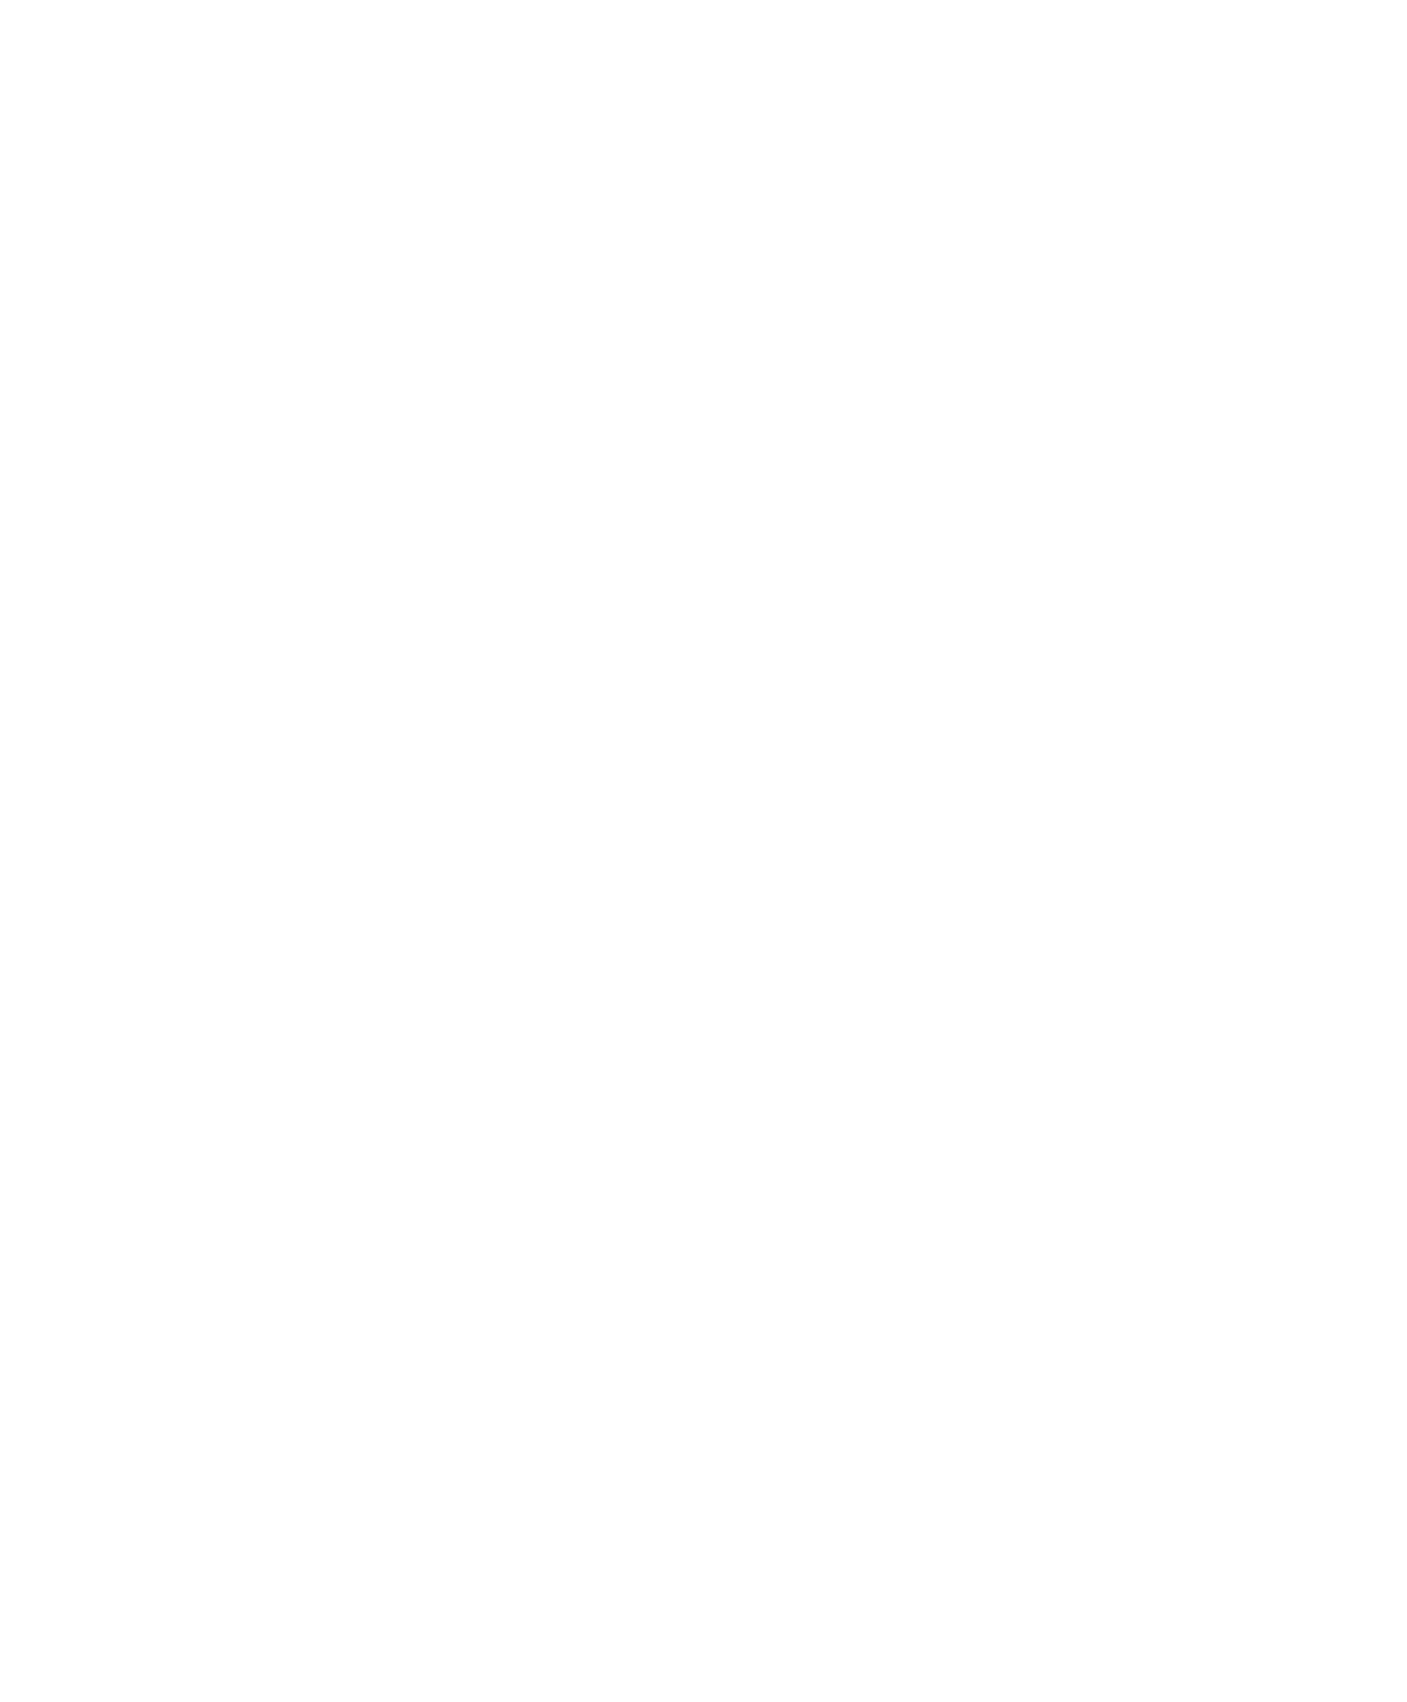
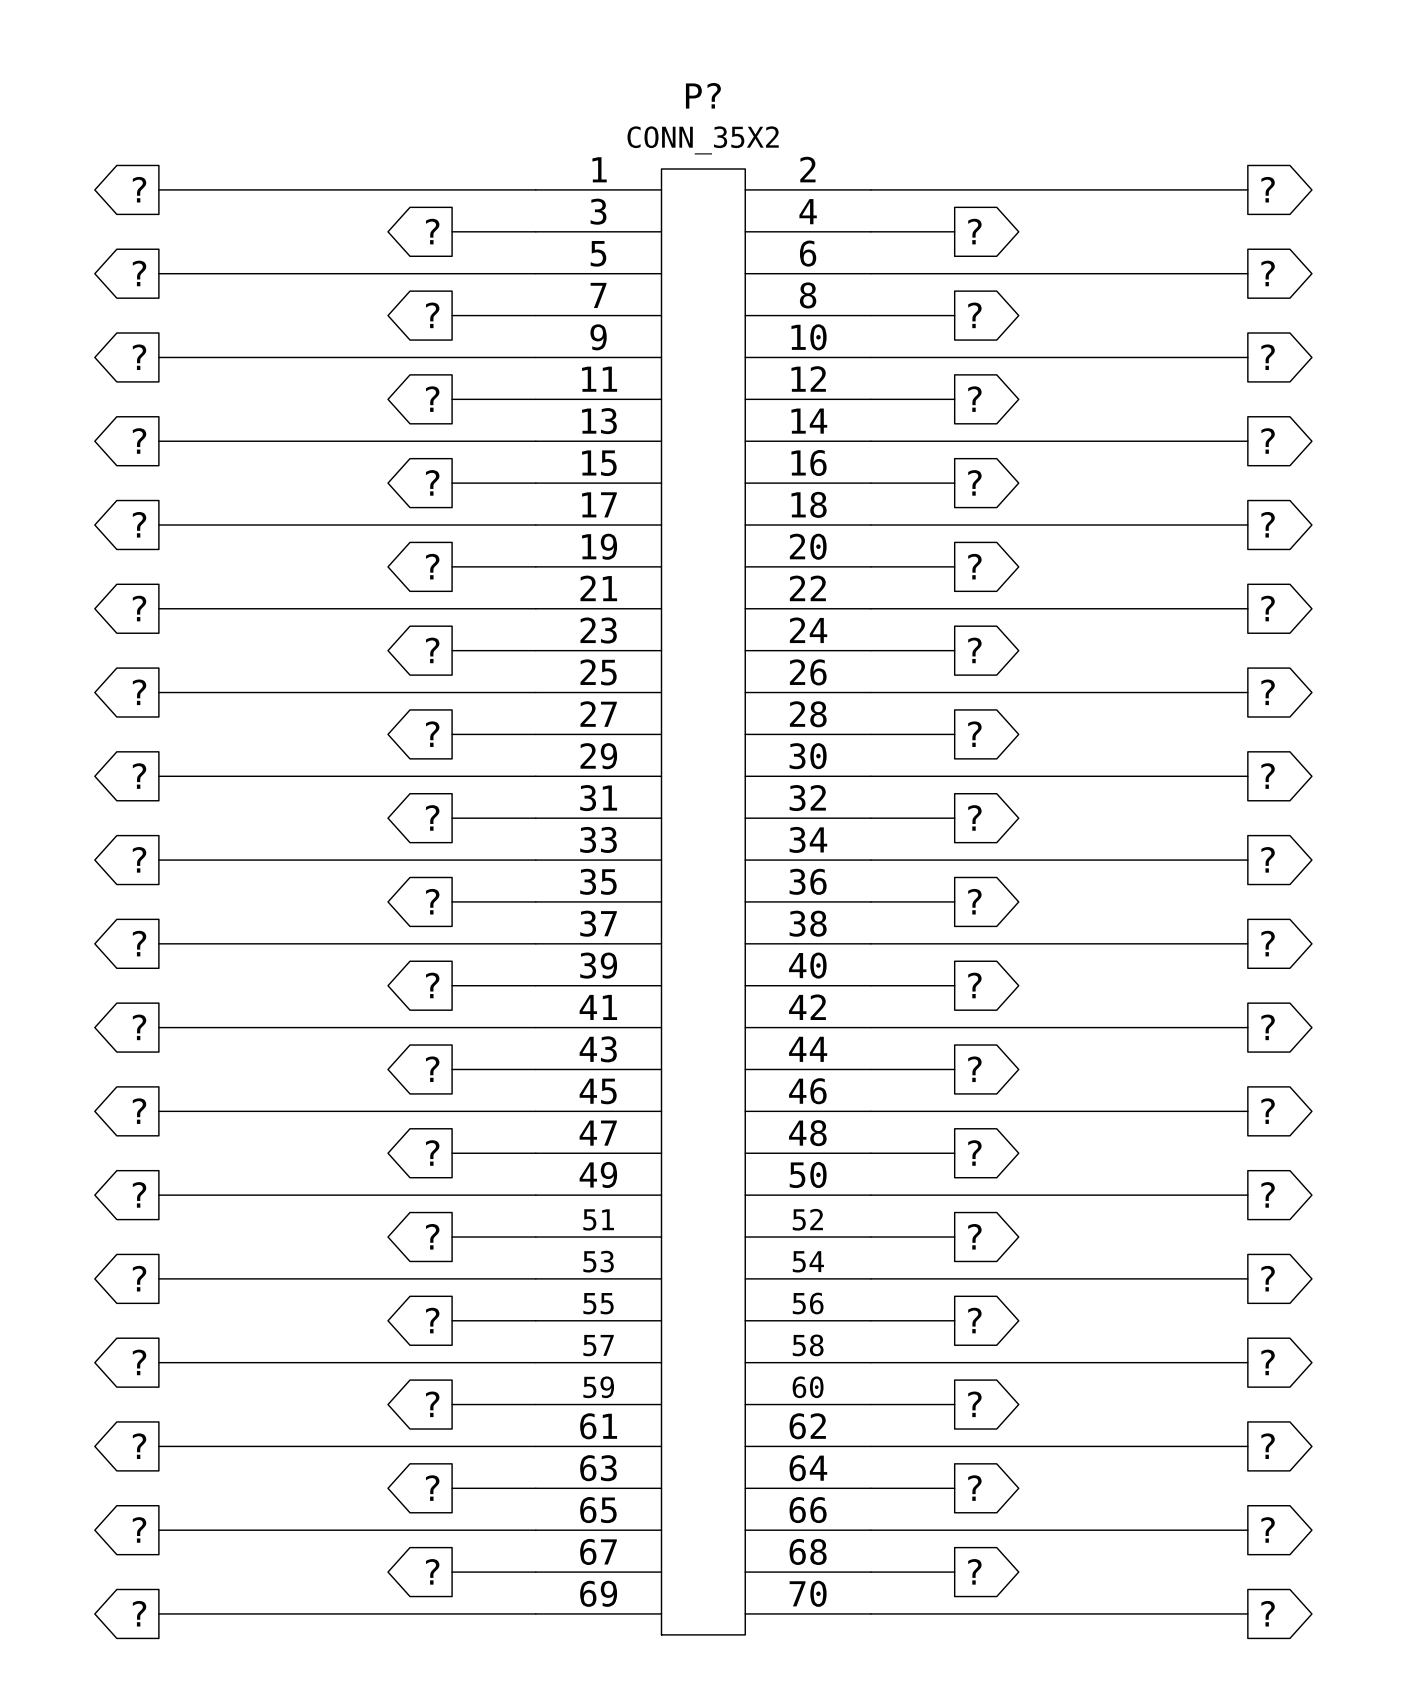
global label: none -> ? (139, 189)
wire: none -> (158, 189) (535, 189)
wire: none -> (870, 189) (1247, 189)
global label: none -> ? (1268, 189)
global label: none -> ? (432, 231)
wire: none -> (452, 231) (535, 231)
wire: none -> (870, 231) (954, 231)
global label: none -> ? (974, 231)
global label: none -> ? (139, 273)
wire: none -> (158, 273) (535, 273)
wire: none -> (870, 273) (1247, 273)
global label: none -> ? (1268, 273)
global label: none -> ? (432, 315)
wire: none -> (452, 315) (535, 315)
wire: none -> (870, 315) (954, 315)
global label: none -> ? (974, 315)
global label: none -> ? (139, 357)
wire: none -> (158, 357) (535, 357)
wire: none -> (870, 357) (1247, 357)
global label: none -> ? (1268, 357)
global label: none -> ? (432, 399)
wire: none -> (452, 399) (535, 399)
wire: none -> (870, 399) (954, 399)
global label: none -> ? (974, 399)
global label: none -> ? (139, 441)
wire: none -> (158, 441) (535, 441)
wire: none -> (870, 441) (1247, 441)
global label: none -> ? (1268, 441)
global label: none -> ? (432, 482)
wire: none -> (452, 483) (535, 483)
wire: none -> (870, 483) (954, 483)
global label: none -> ? (974, 482)
global label: none -> ? (139, 524)
wire: none -> (158, 525) (535, 525)
wire: none -> (870, 525) (1247, 525)
global label: none -> ? (1268, 524)
global label: none -> ? (432, 566)
wire: none -> (452, 566) (535, 566)
wire: none -> (870, 566) (954, 566)
global label: none -> ? (974, 566)
global label: none -> ? (139, 608)
wire: none -> (158, 608) (535, 608)
wire: none -> (870, 608) (1247, 608)
global label: none -> ? (1268, 608)
global label: none -> ? (432, 650)
wire: none -> (452, 650) (535, 650)
wire: none -> (870, 650) (954, 650)
global label: none -> ? (974, 650)
global label: none -> ? (139, 692)
wire: none -> (158, 692) (535, 692)
wire: none -> (870, 692) (1247, 692)
global label: none -> ? (1268, 692)
global label: none -> ? (432, 734)
wire: none -> (452, 734) (535, 734)
wire: none -> (870, 734) (954, 734)
global label: none -> ? (974, 734)
global label: none -> ? (139, 776)
wire: none -> (158, 776) (535, 776)
wire: none -> (870, 776) (1247, 776)
global label: none -> ? (1268, 776)
global label: none -> ? (432, 817)
wire: none -> (452, 818) (535, 818)
wire: none -> (870, 818) (954, 818)
global label: none -> ? (974, 817)
global label: none -> ? (139, 859)
wire: none -> (158, 860) (535, 860)
wire: none -> (870, 860) (1247, 860)
global label: none -> ? (1268, 859)
global label: none -> ? (432, 901)
wire: none -> (452, 901) (535, 901)
P?: none -> CONN_35X2 (703, 901)
wire: none -> (870, 901) (954, 901)
global label: none -> ? (974, 901)
global label: none -> ? (139, 943)
wire: none -> (158, 943) (535, 943)
wire: none -> (870, 943) (1247, 943)
global label: none -> ? (1268, 943)
global label: none -> ? (432, 985)
wire: none -> (452, 985) (535, 985)
wire: none -> (870, 985) (954, 985)
global label: none -> ? (974, 985)
global label: none -> ? (139, 1027)
wire: none -> (158, 1027) (535, 1027)
wire: none -> (870, 1027) (1247, 1027)
global label: none -> ? (1268, 1027)
global label: none -> ? (432, 1069)
wire: none -> (452, 1069) (535, 1069)
wire: none -> (870, 1069) (954, 1069)
global label: none -> ? (974, 1069)
global label: none -> ? (139, 1111)
wire: none -> (158, 1111) (535, 1111)
wire: none -> (870, 1111) (1247, 1111)
global label: none -> ? (1268, 1111)
global label: none -> ? (432, 1153)
wire: none -> (452, 1153) (535, 1153)
wire: none -> (870, 1153) (954, 1153)
global label: none -> ? (974, 1153)
global label: none -> ? (139, 1194)
wire: none -> (158, 1195) (535, 1195)
wire: none -> (870, 1195) (1247, 1195)
global label: none -> ? (1268, 1194)
global label: none -> ? (432, 1236)
wire: none -> (452, 1237) (535, 1237)
wire: none -> (870, 1237) (954, 1237)
global label: none -> ? (974, 1236)
global label: none -> ? (139, 1278)
wire: none -> (158, 1278) (535, 1278)
wire: none -> (870, 1278) (1247, 1278)
global label: none -> ? (1268, 1278)
global label: none -> ? (432, 1320)
wire: none -> (452, 1320) (535, 1320)
wire: none -> (870, 1320) (954, 1320)
global label: none -> ? (974, 1320)
global label: none -> ? (139, 1362)
wire: none -> (158, 1362) (535, 1362)
wire: none -> (870, 1362) (1247, 1362)
global label: none -> ? (1268, 1362)
global label: none -> ? (432, 1404)
wire: none -> (452, 1404) (535, 1404)
wire: none -> (870, 1404) (954, 1404)
global label: none -> ? (974, 1404)
global label: none -> ? (139, 1446)
wire: none -> (158, 1446) (535, 1446)
wire: none -> (870, 1446) (1247, 1446)
global label: none -> ? (1268, 1446)
global label: none -> ? (432, 1488)
wire: none -> (452, 1488) (535, 1488)
wire: none -> (870, 1488) (954, 1488)
global label: none -> ? (974, 1488)
global label: none -> ? (139, 1529)
wire: none -> (158, 1530) (535, 1530)
wire: none -> (870, 1530) (1247, 1530)
global label: none -> ? (1268, 1529)
global label: none -> ? (432, 1571)
wire: none -> (452, 1572) (535, 1572)
wire: none -> (870, 1572) (954, 1572)
global label: none -> ? (974, 1571)
global label: none -> ? (139, 1613)
wire: none -> (158, 1613) (535, 1613)
wire: none -> (870, 1613) (1247, 1613)
global label: none -> ? (1268, 1613)

